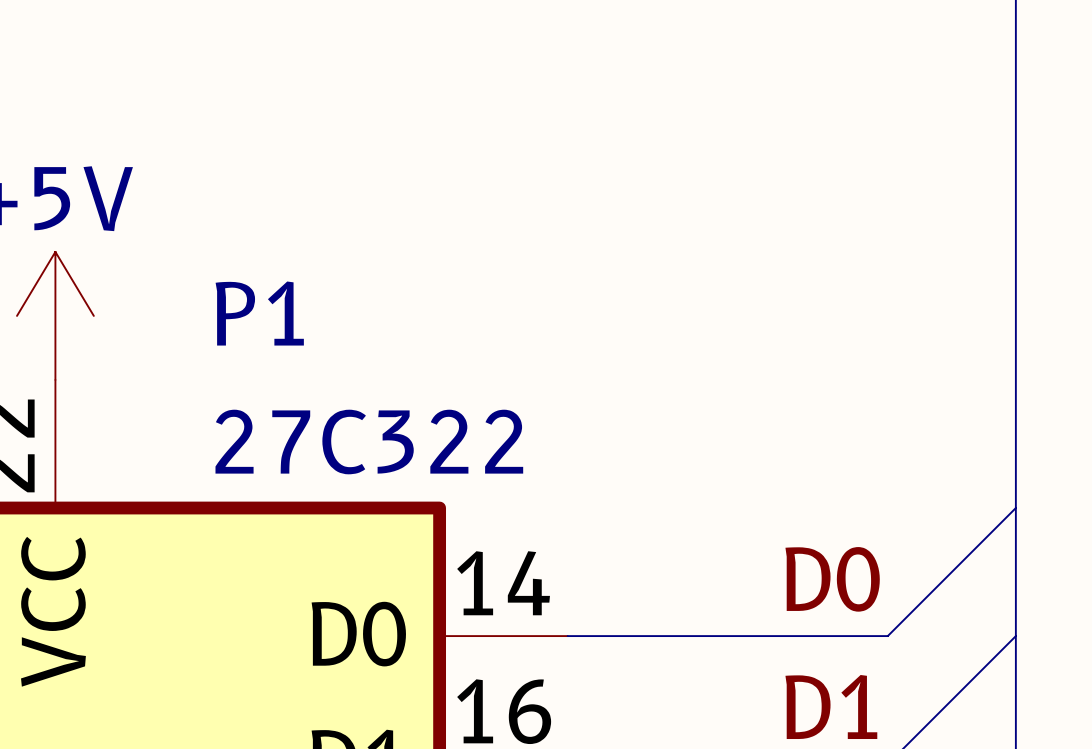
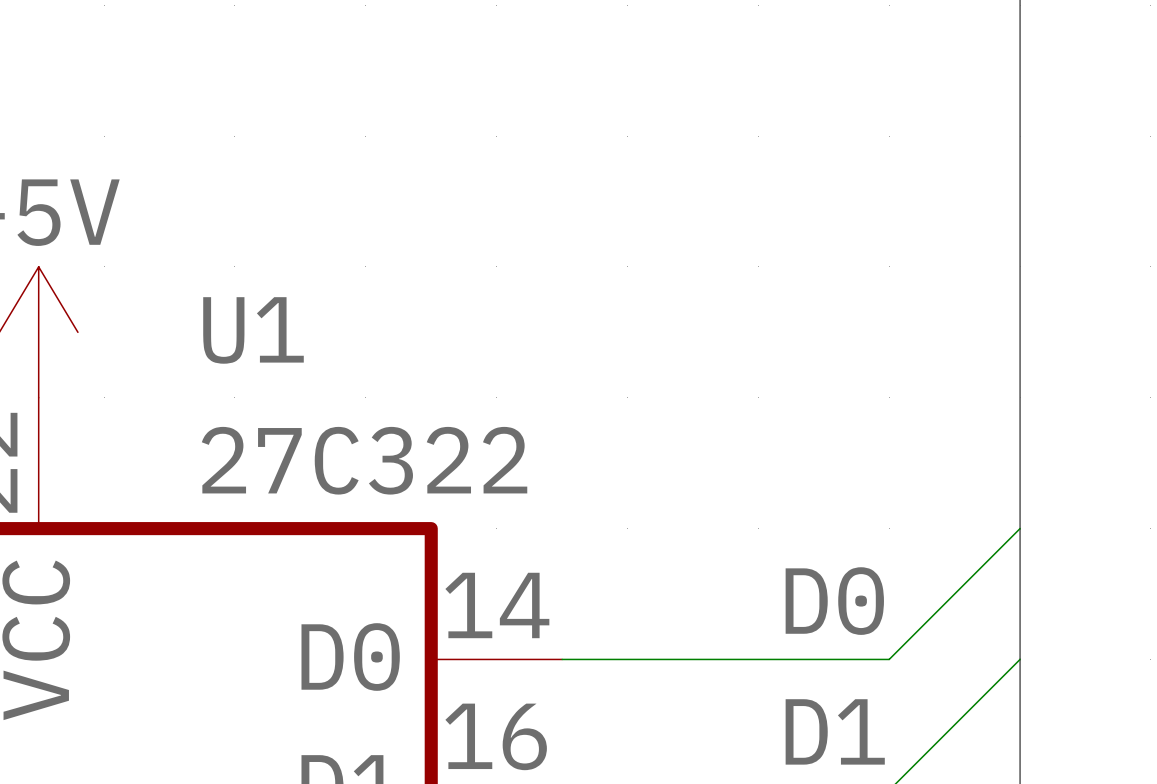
P1 name: P1 (259, 313) -> U1 (253, 330)

